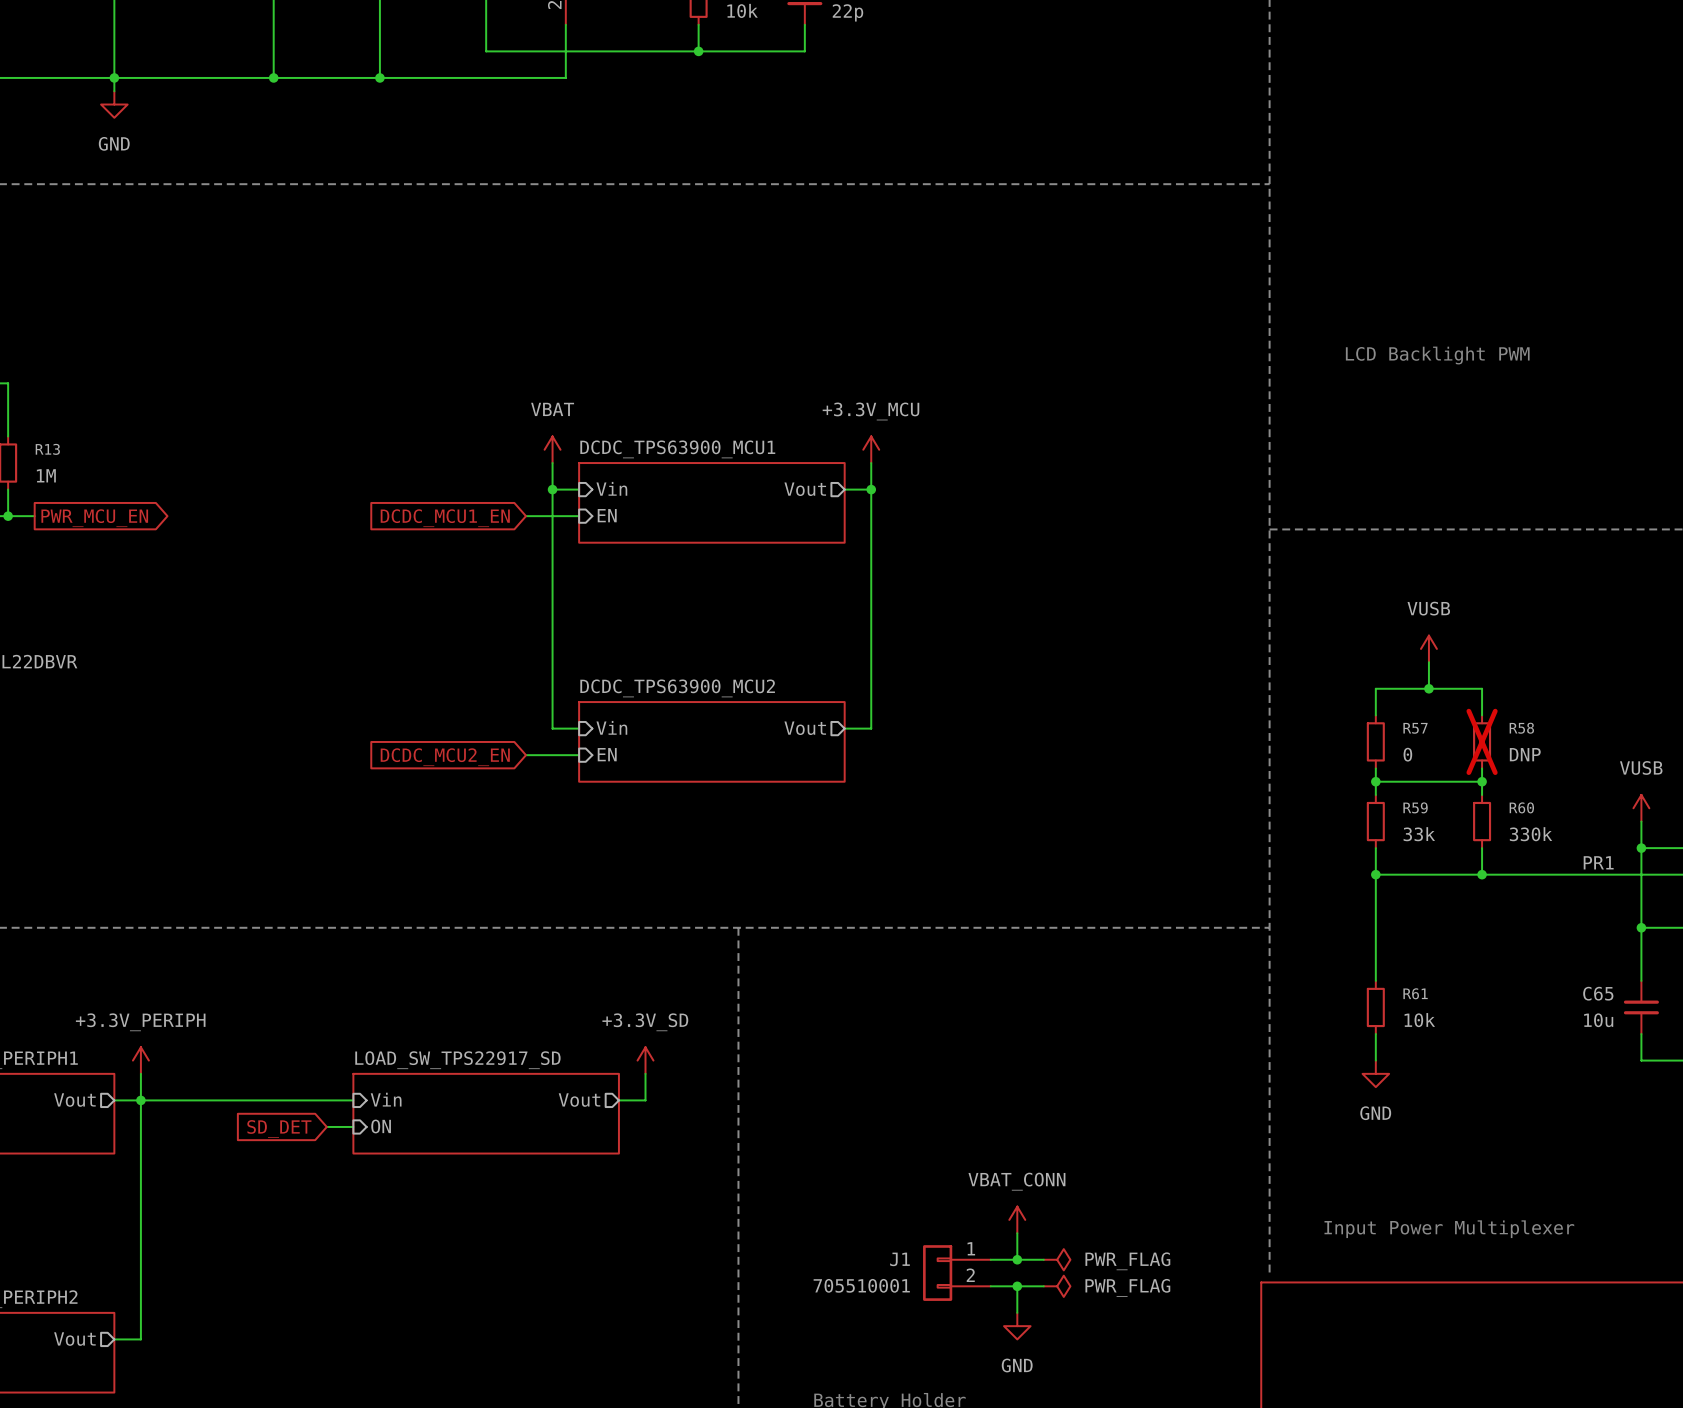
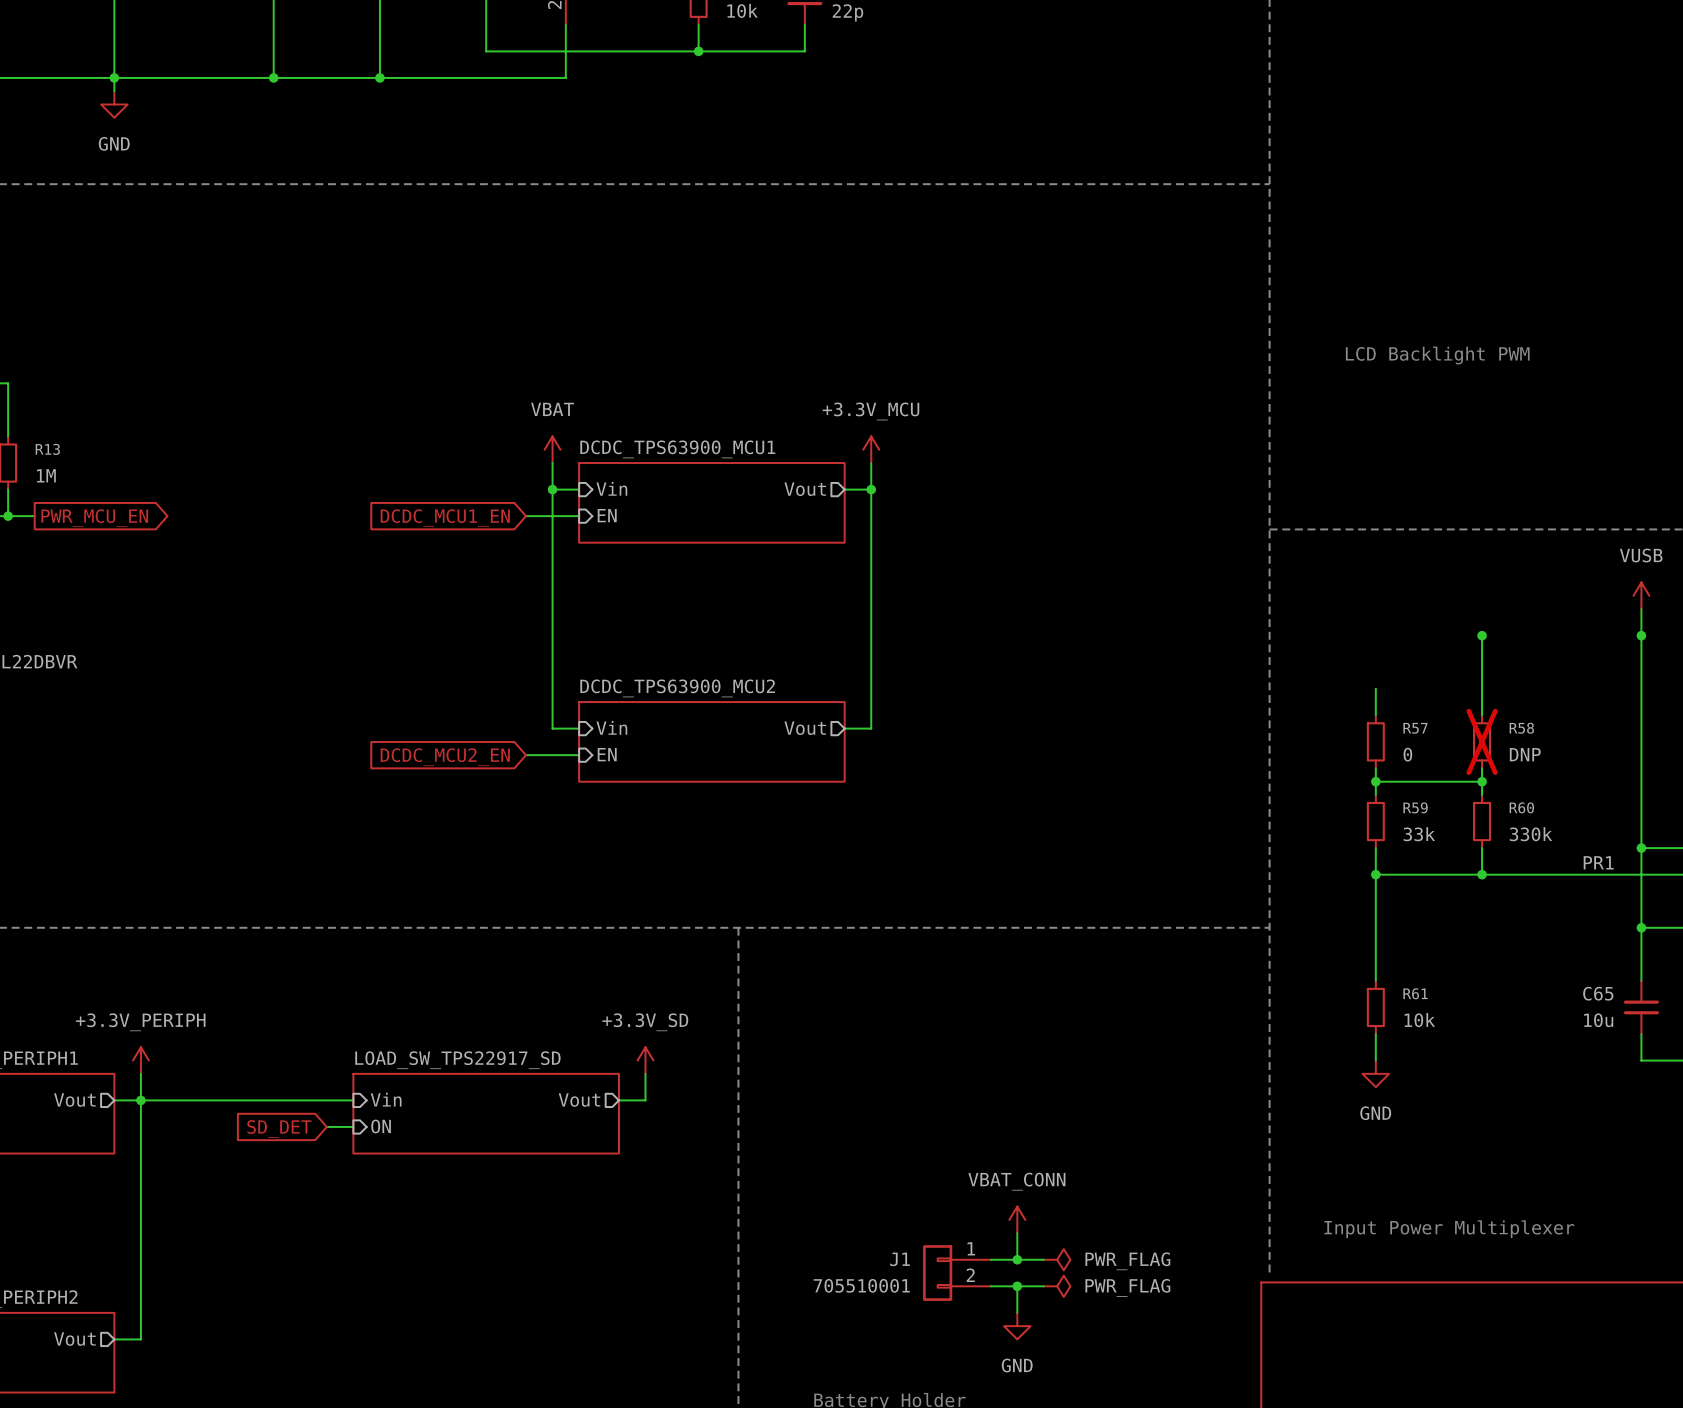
power symbol: none -> VUSB (1641, 595)
wire: none -> (1641, 609) (1641, 821)
junction: none -> (1482, 635)
junction: none -> (1641, 635)
power symbol: VUSB (1428, 648) -> none
wire: (1428, 662) (1428, 688) -> none
wire: (1375, 688) (1482, 688) -> (1482, 635) (1482, 688)
junction: (1428, 688) -> none
power symbol: VUSB (1641, 808) -> none

